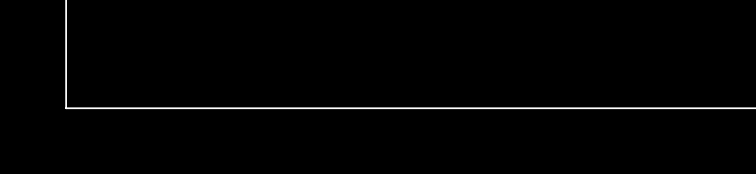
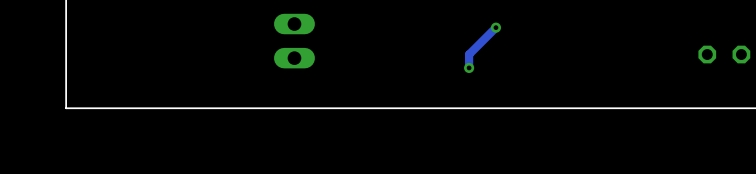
track: none -> (495, 27) (469, 54) (469, 67)
via: none -> (495, 27)
part: none -> (294, 41)
part: none -> (724, 54)
via: none -> (469, 67)

